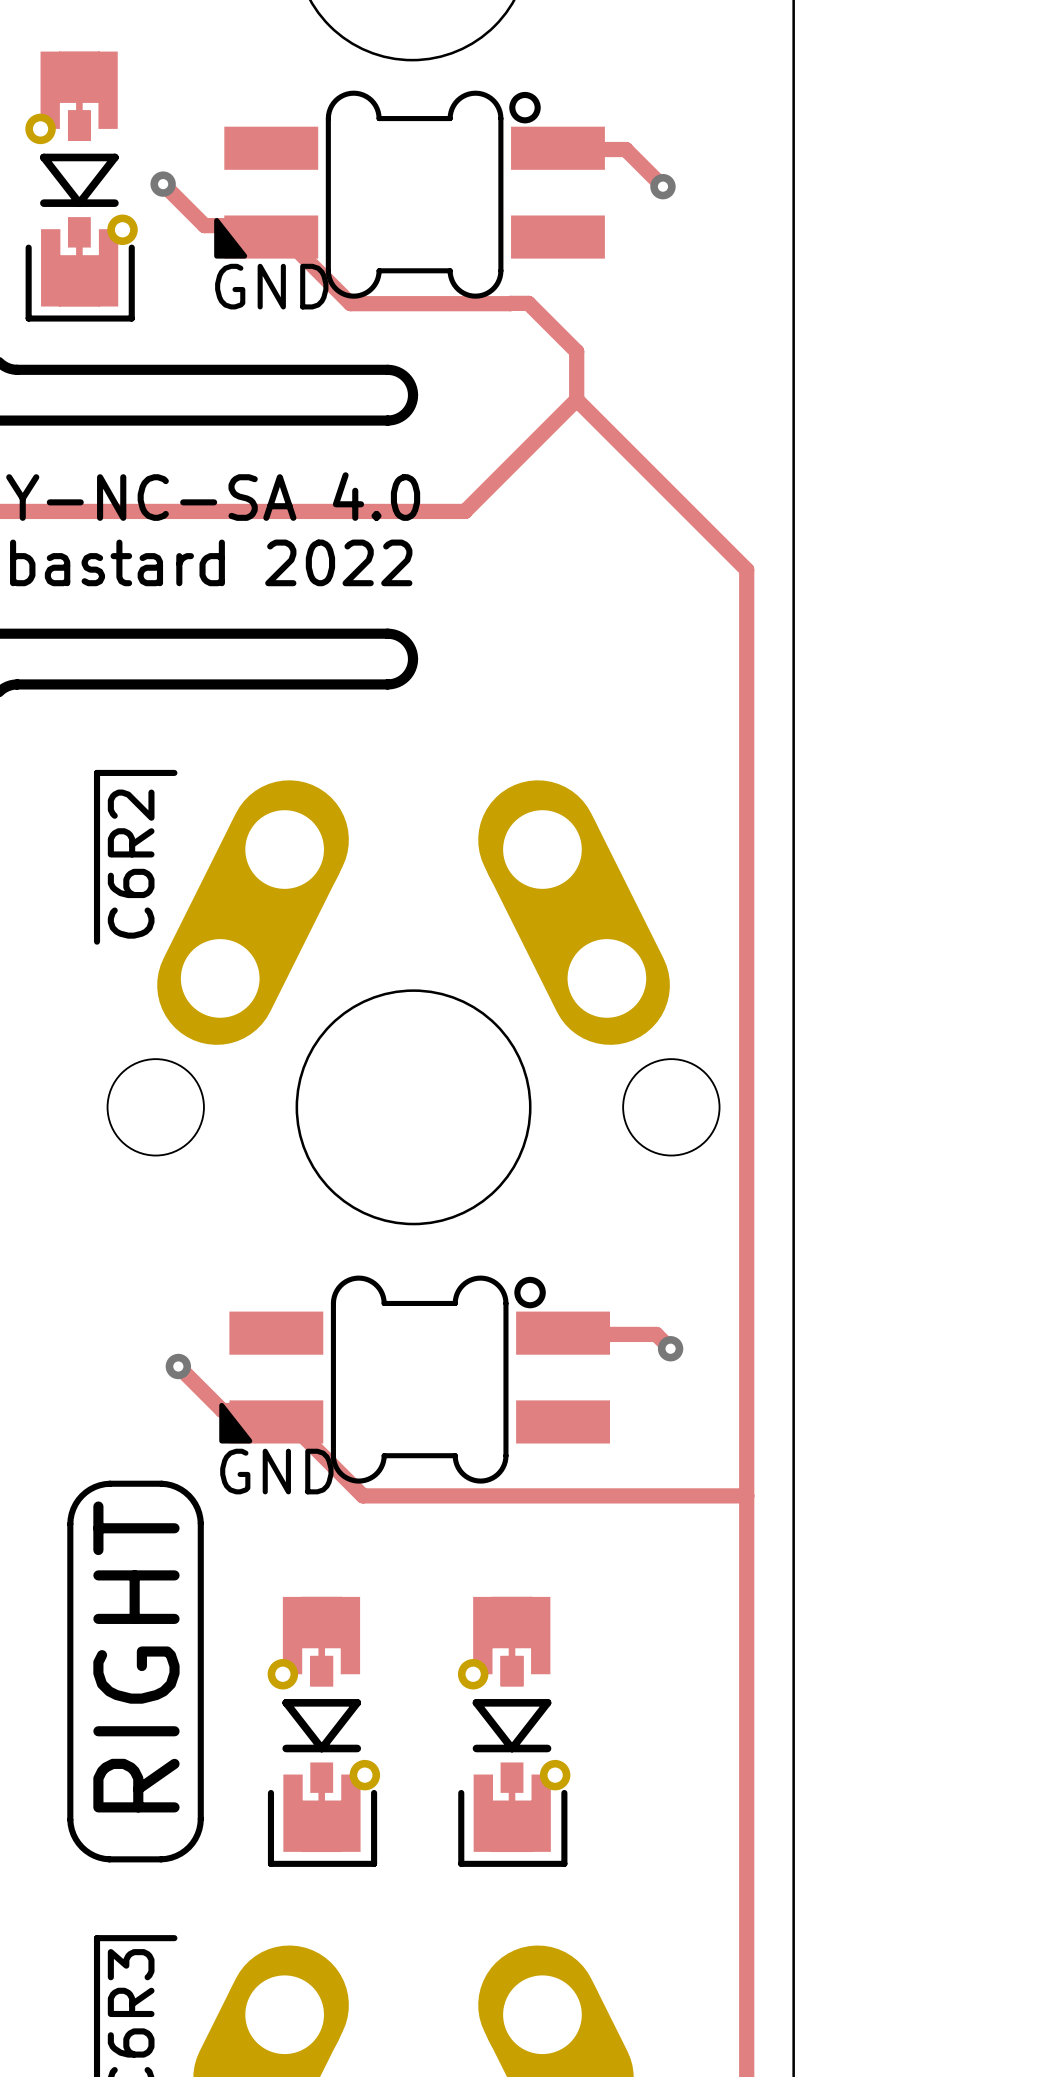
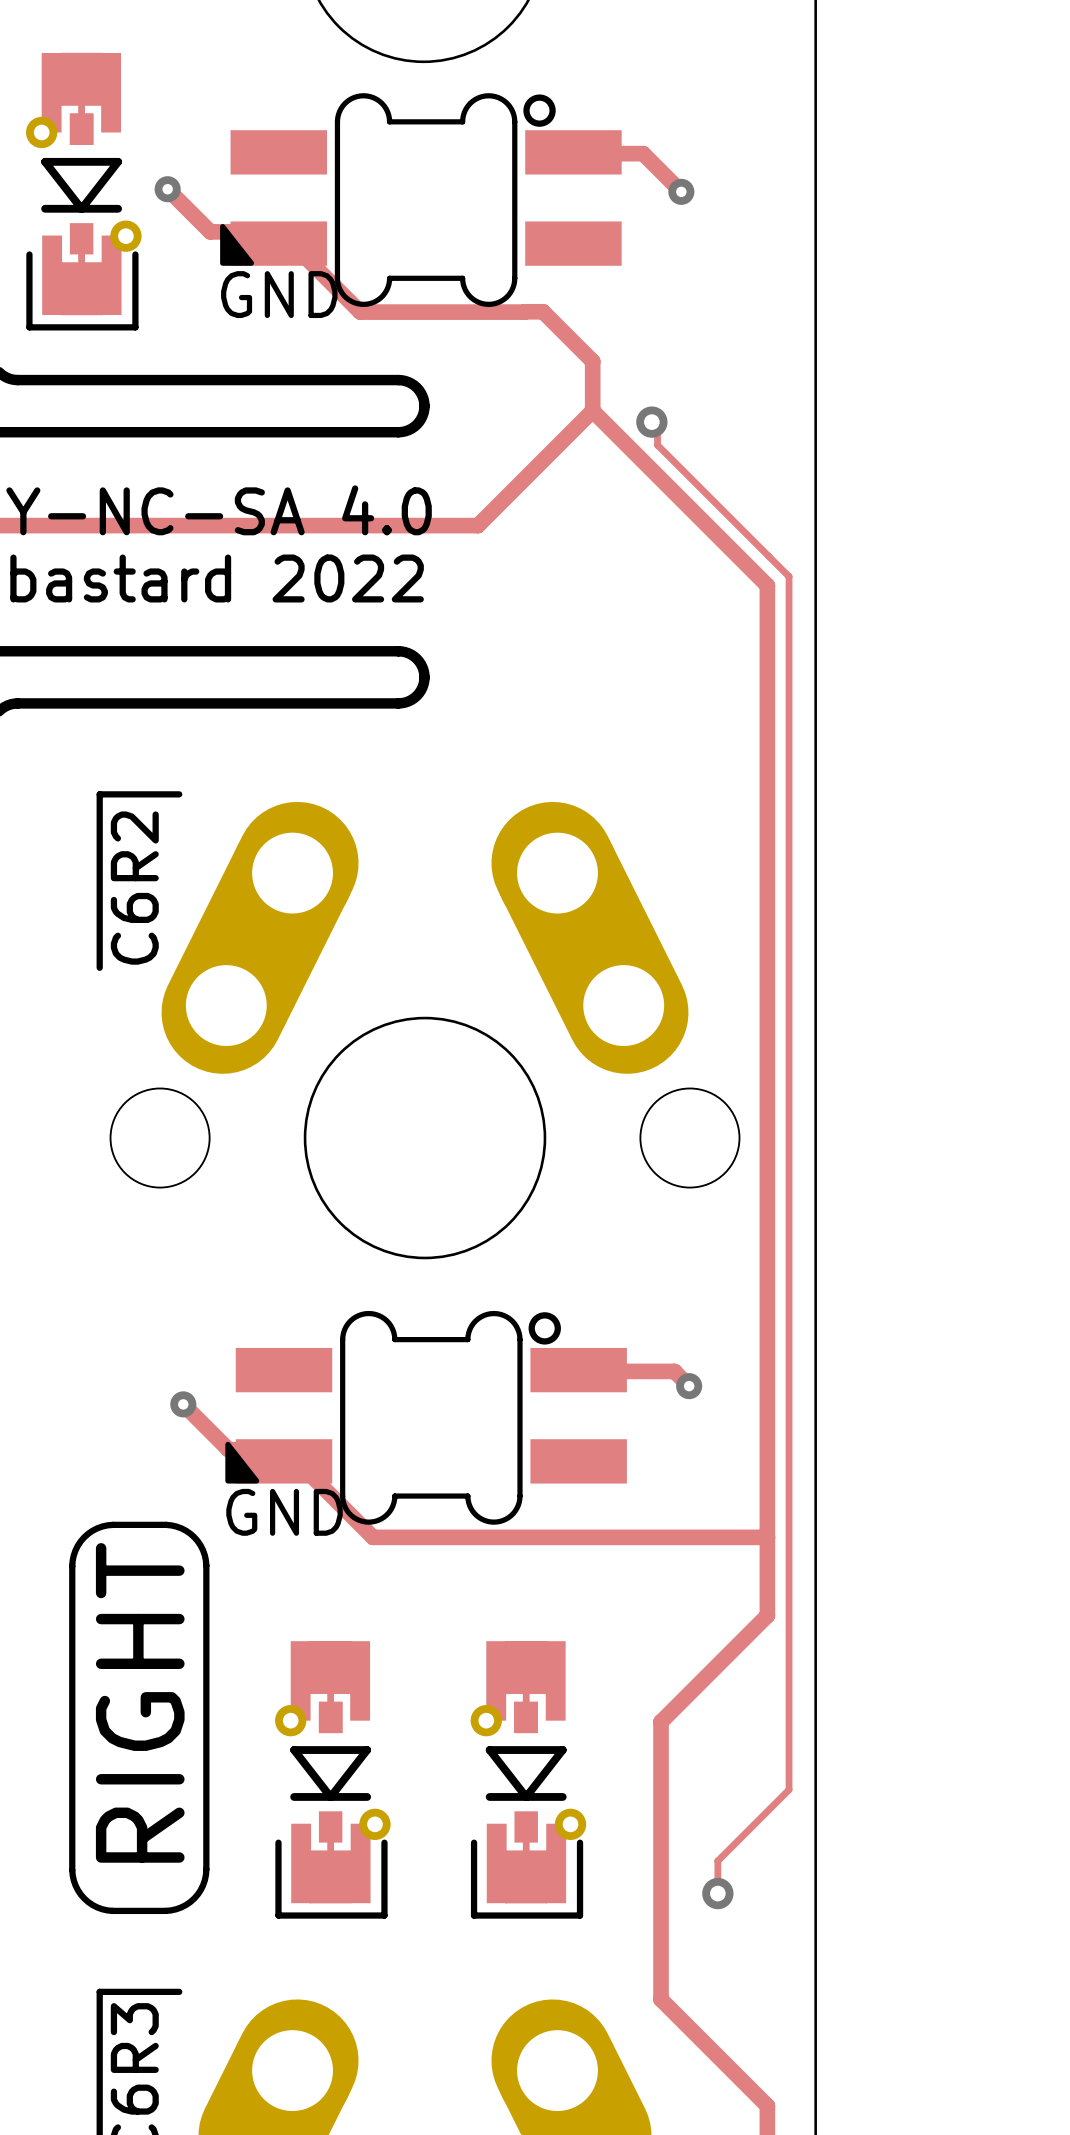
track: none -> (651, 422) (657, 427) (657, 445) (789, 576) (789, 1789) (717, 1860) (717, 1893)
via: none -> (651, 422)
track: (746, 1572) (746, 2049) -> (767, 1615) (661, 1721) (661, 1999) (767, 2105)
via: none -> (717, 1893)

